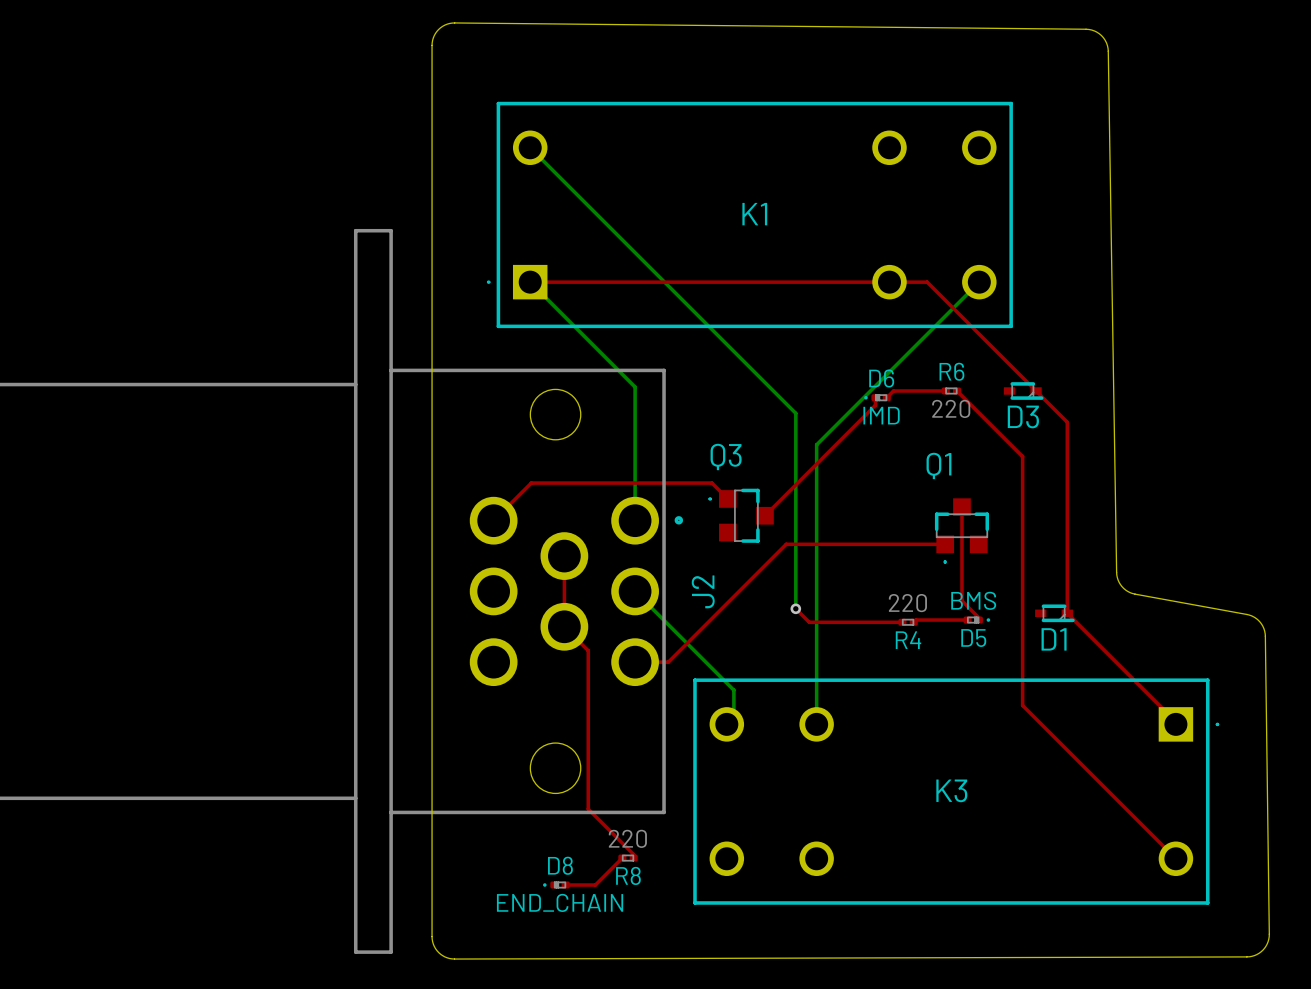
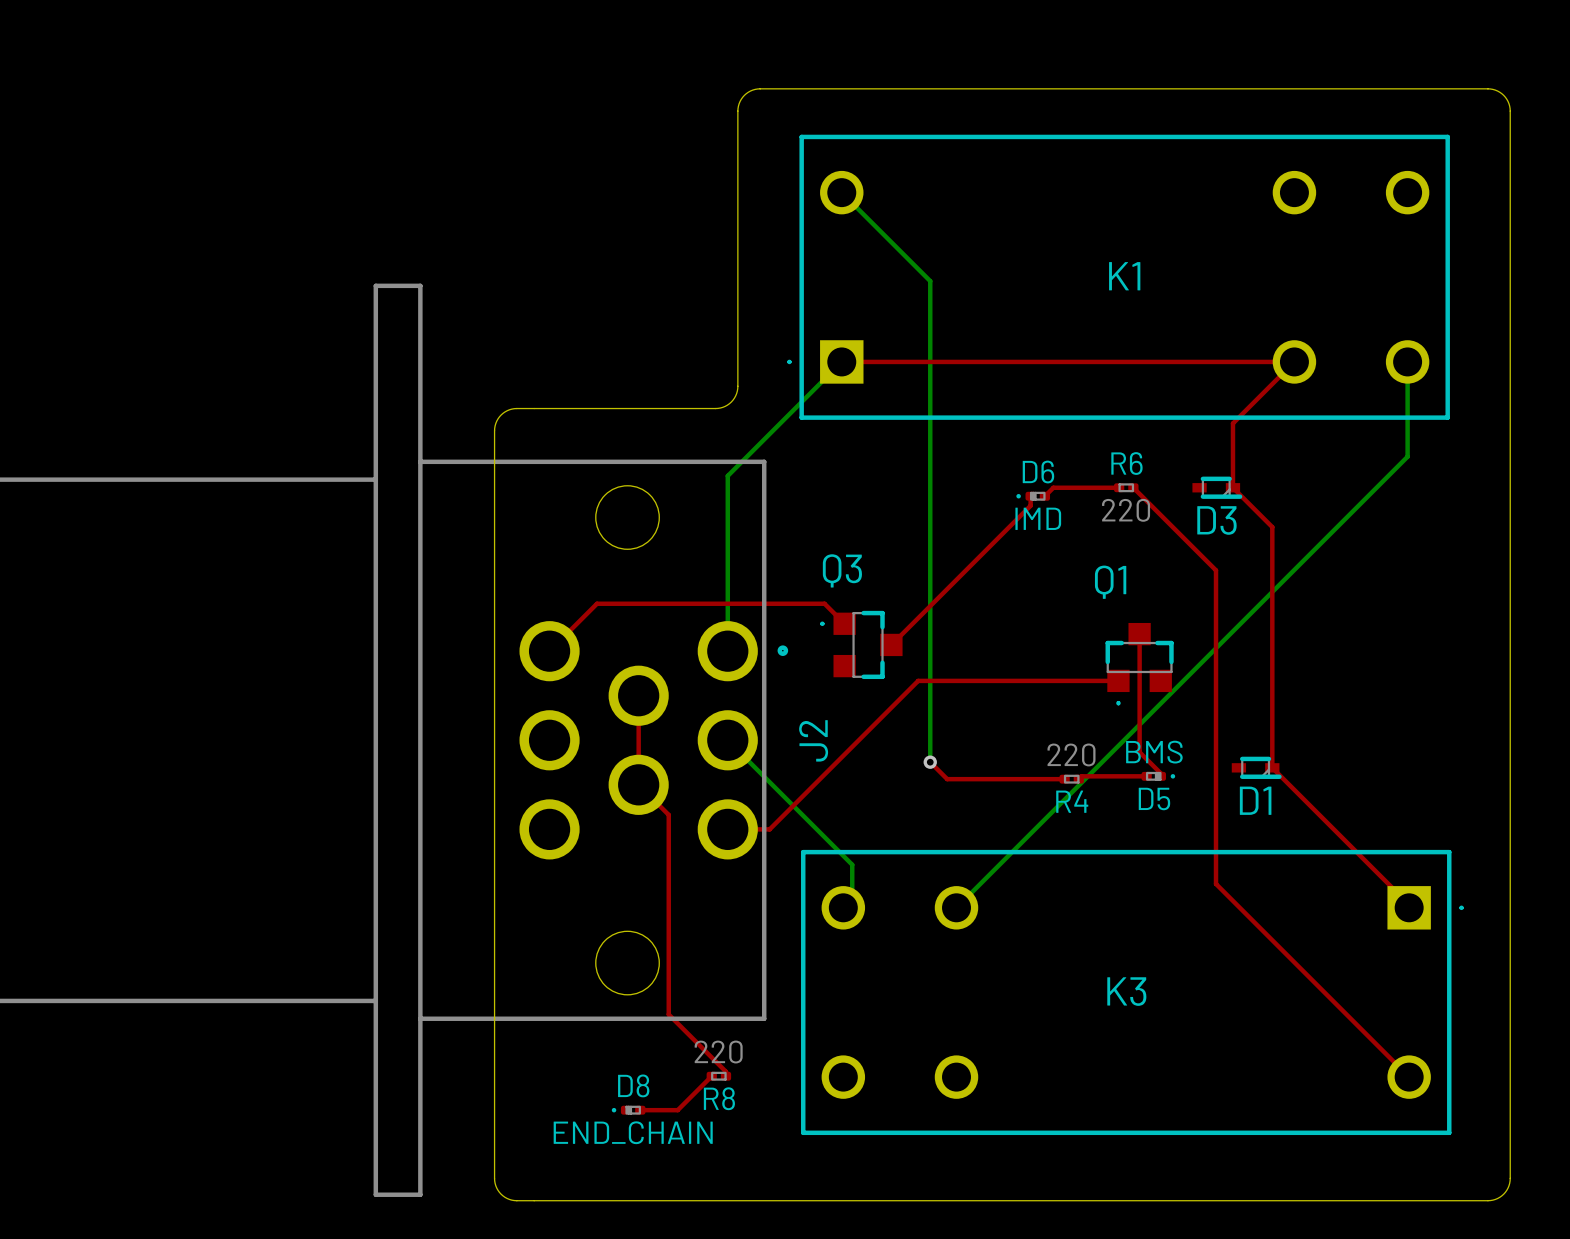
board edge: (454, 22) (1086, 29) (1094, 30) (1103, 37) (1108, 51) (1116, 574) (1121, 586) (1132, 593) (1249, 615) (1258, 620) (1263, 628) (1269, 934) (1267, 944) (1260, 951) (1246, 956) (454, 959) (444, 956) (436, 950) (432, 936) (432, 45) (434, 35) (438, 29) (447, 24) (454, 22) -> (760, 88) (750, 91) (744, 95) (738, 108) (737, 386) (733, 400) (725, 406) (715, 408) (514, 408) (501, 415) (495, 425) (494, 1178) (497, 1190) (507, 1198) (516, 1200) (1487, 1200) (1499, 1197) (1508, 1188) (1510, 1178) (1510, 111) (1506, 99) (1497, 91) (1487, 88) (760, 88)
bottom track: (530, 147) (795, 413) -> (841, 192) (930, 281) (930, 515)
K1 position: (749, 214) -> (1118, 277)
top track: (530, 282) (883, 282) -> none
bottom track: (530, 282) (635, 387) -> (841, 361) (727, 475) (727, 482)
top track: (889, 282) (927, 282) (1036, 390) -> (841, 361) (1294, 361) (1232, 423) (1232, 487)
bottom track: (979, 282) (816, 444) (816, 724) -> (1407, 361) (1407, 456) (956, 907)

